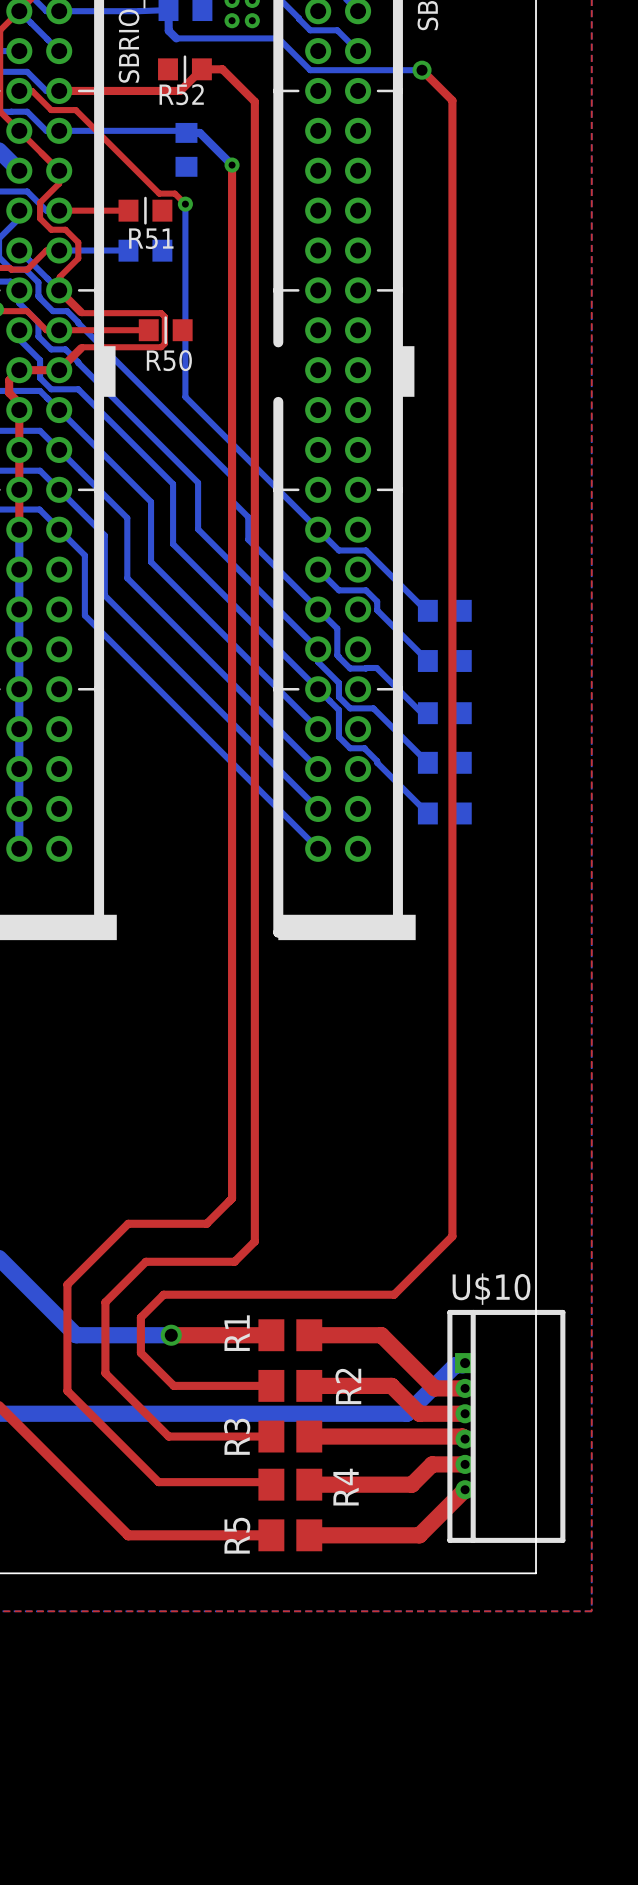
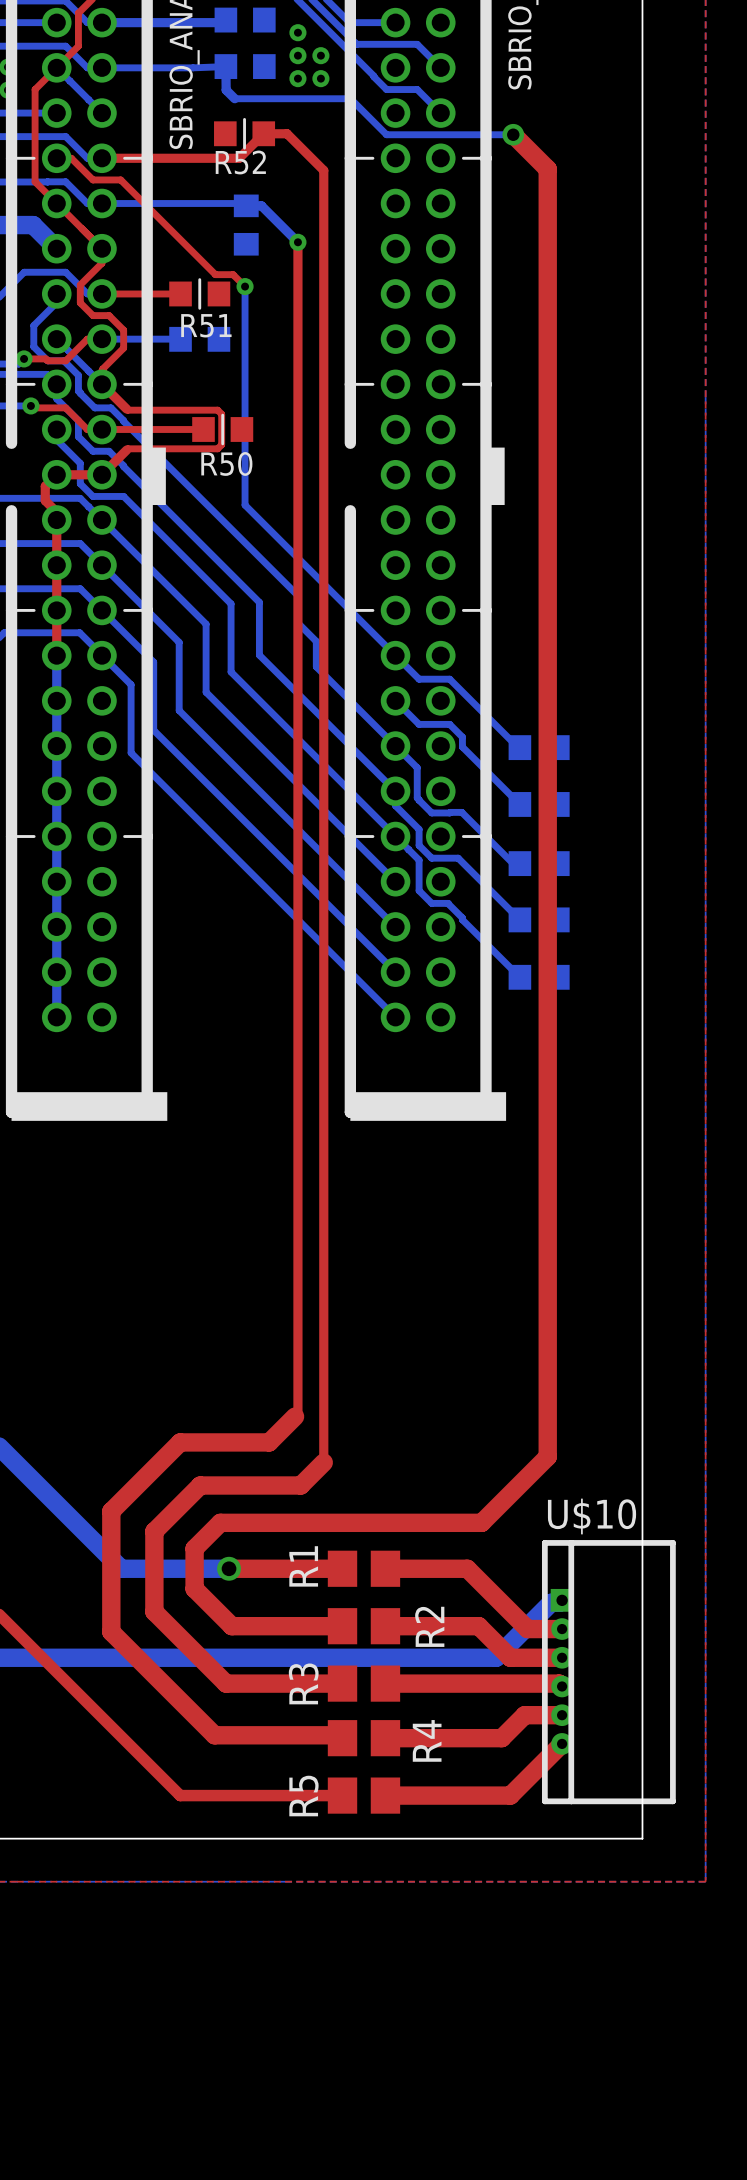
top track width: thin (422, 70) (452, 100) (452, 1236) (394, 1294) (163, 1294) (140, 1317) (140, 1352) (173, 1385) (271, 1385) -> thick (513, 134) (547, 169) (547, 1456) (481, 1522) (220, 1522) (194, 1548) (194, 1588) (231, 1626) (342, 1626)
top track width: thin (229, 1200) (206, 1223) (128, 1223) (67, 1284) (67, 1390) (158, 1482) (268, 1482) -> thick (295, 1416) (269, 1442) (180, 1442) (111, 1511) (111, 1631) (214, 1735) (339, 1735)
top track width: thin (254, 1241) (234, 1261) (145, 1261) (105, 1302) (105, 1373) (168, 1436) (271, 1436) -> thick (323, 1462) (300, 1485) (200, 1485) (154, 1531) (154, 1611) (226, 1683) (342, 1683)

